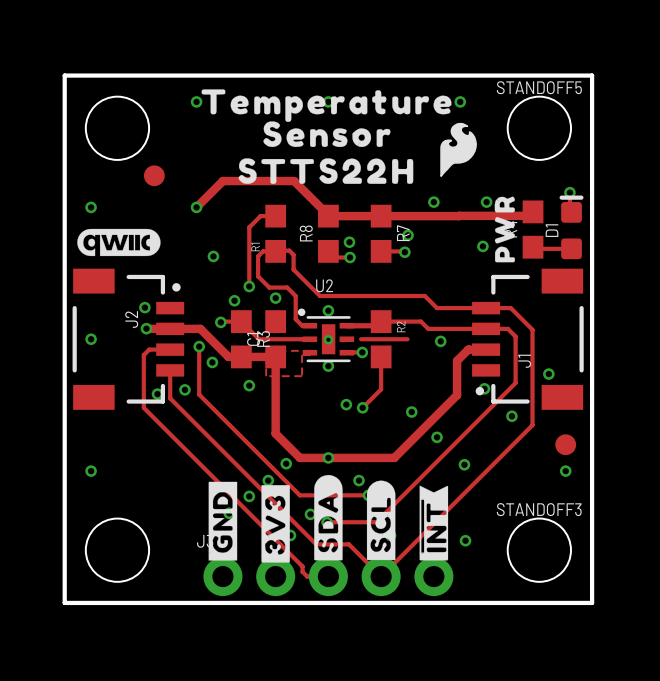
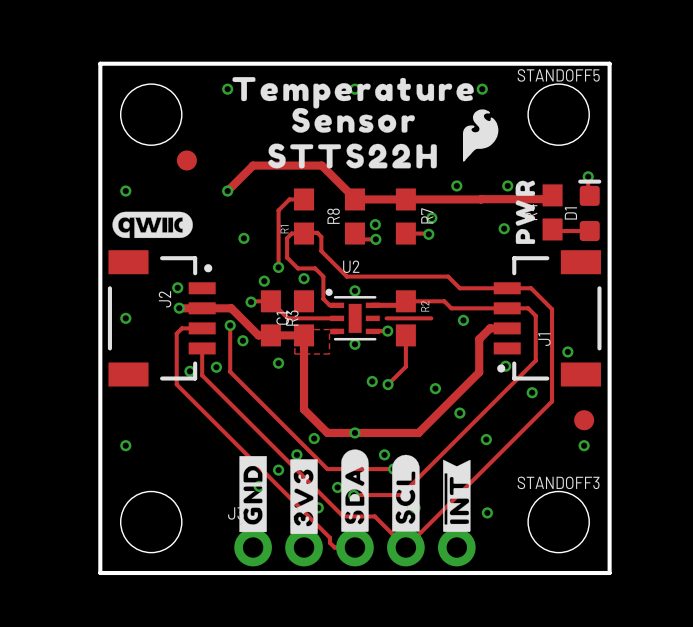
via: (328, 339) -> none

